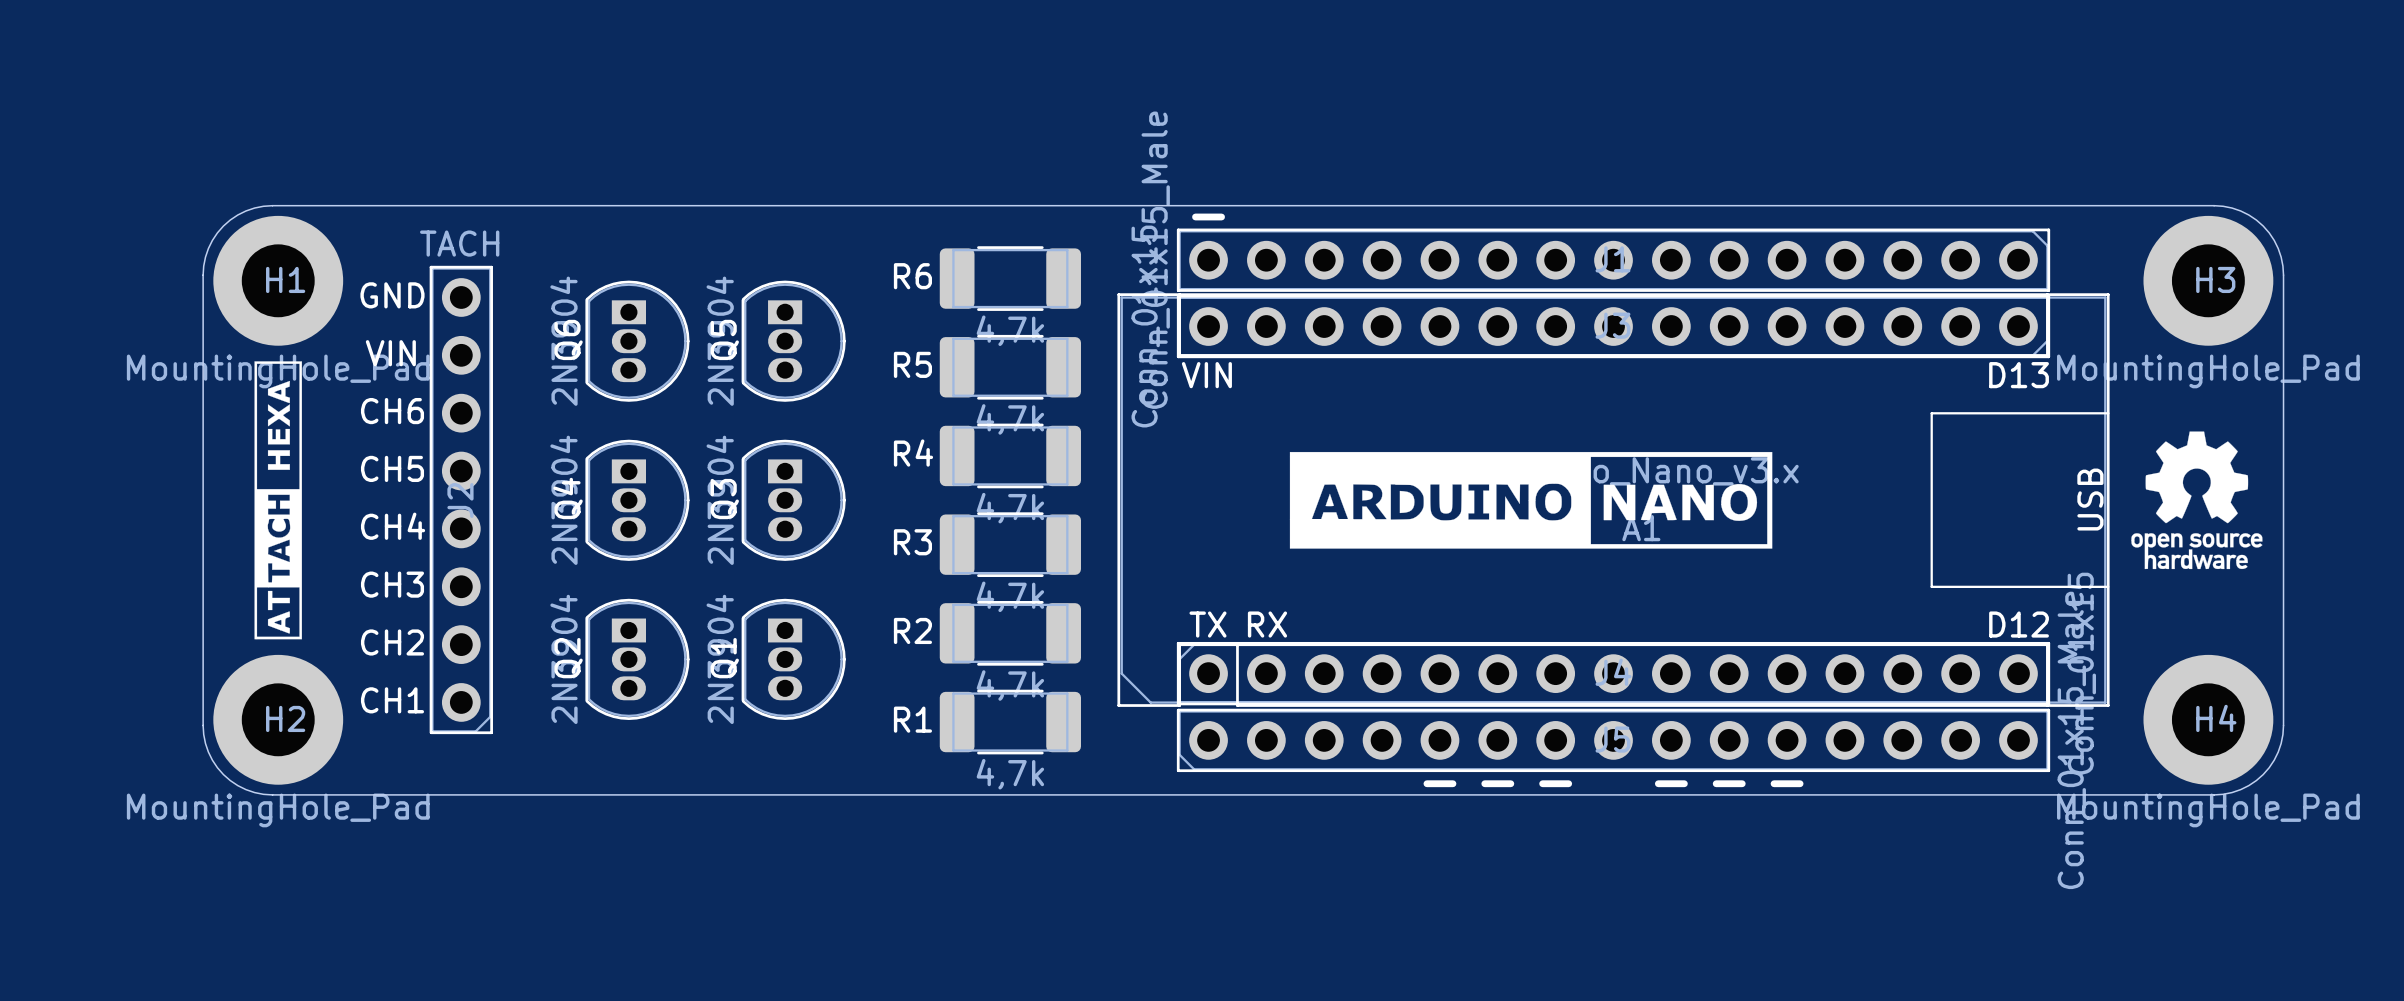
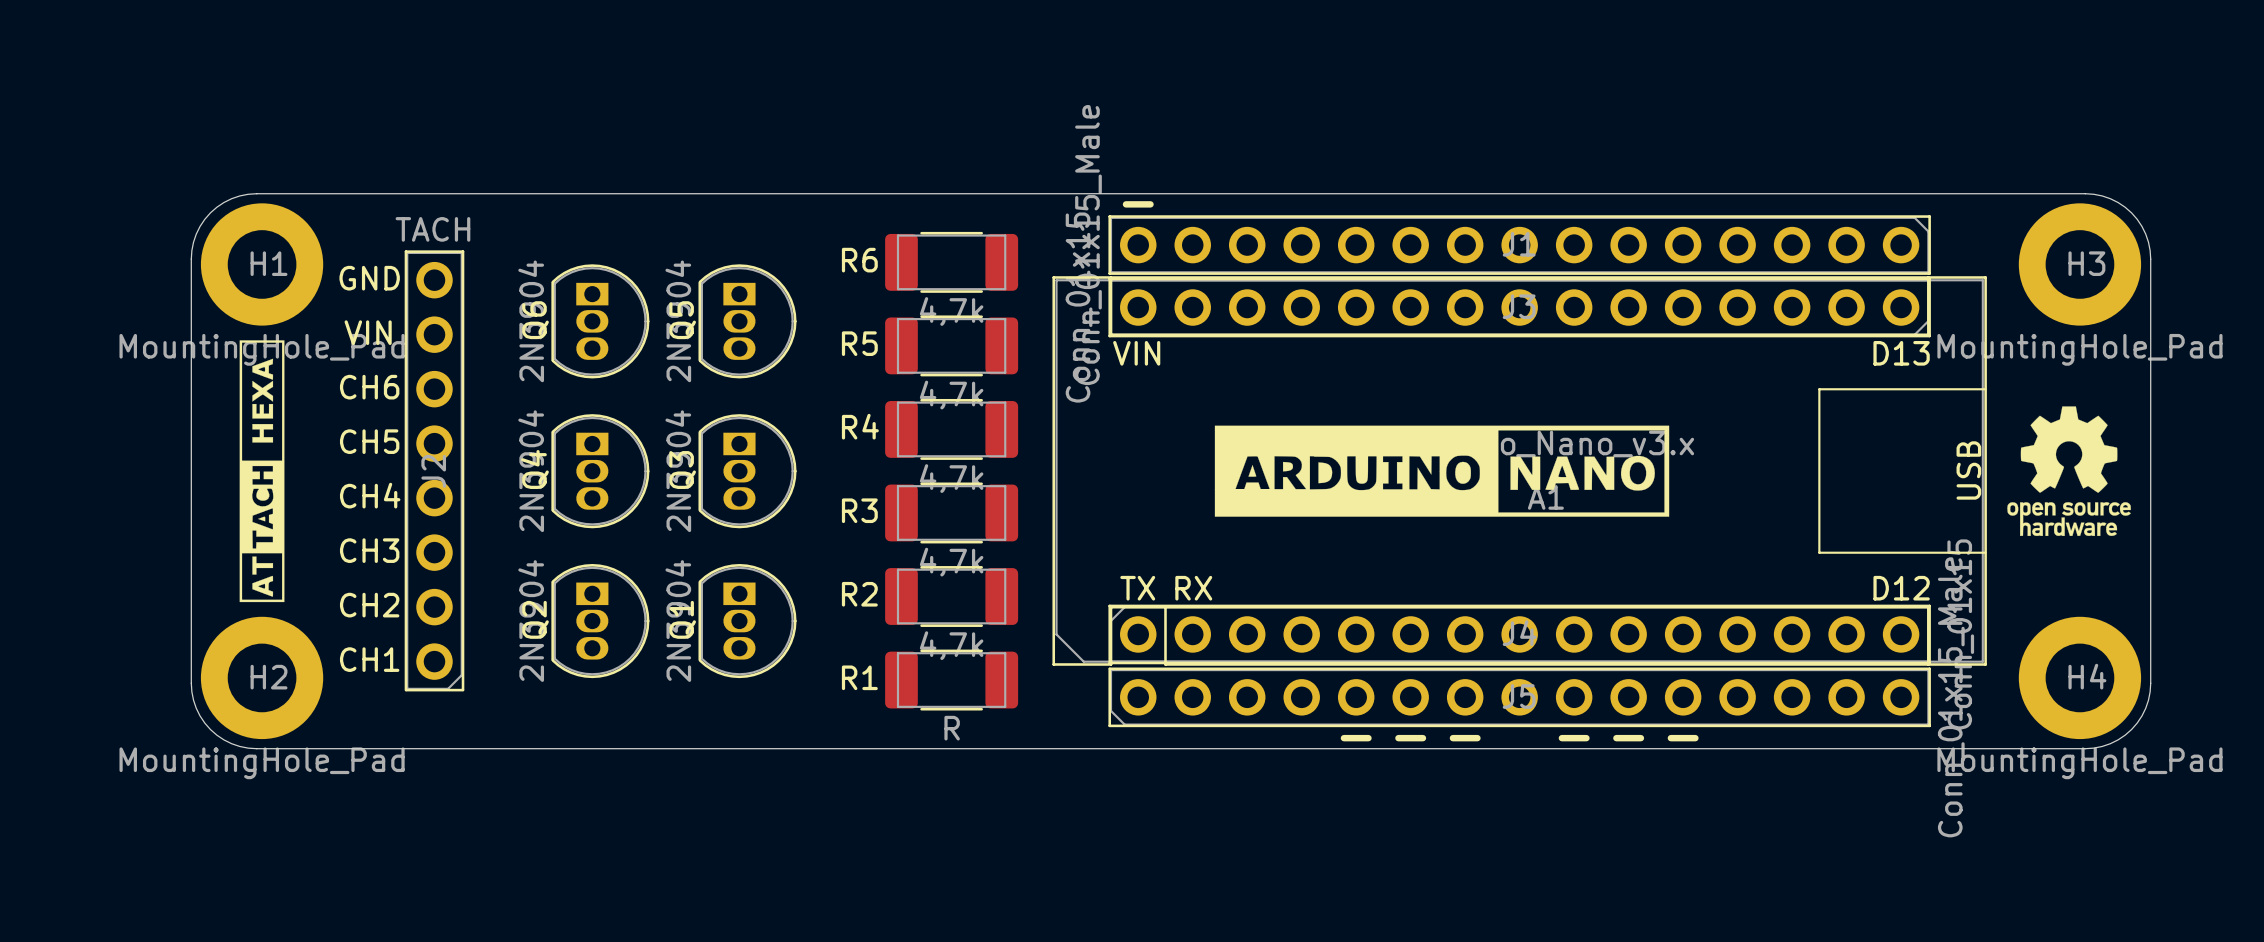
R1 value: 4,7k (1010, 774) -> R (952, 728)

